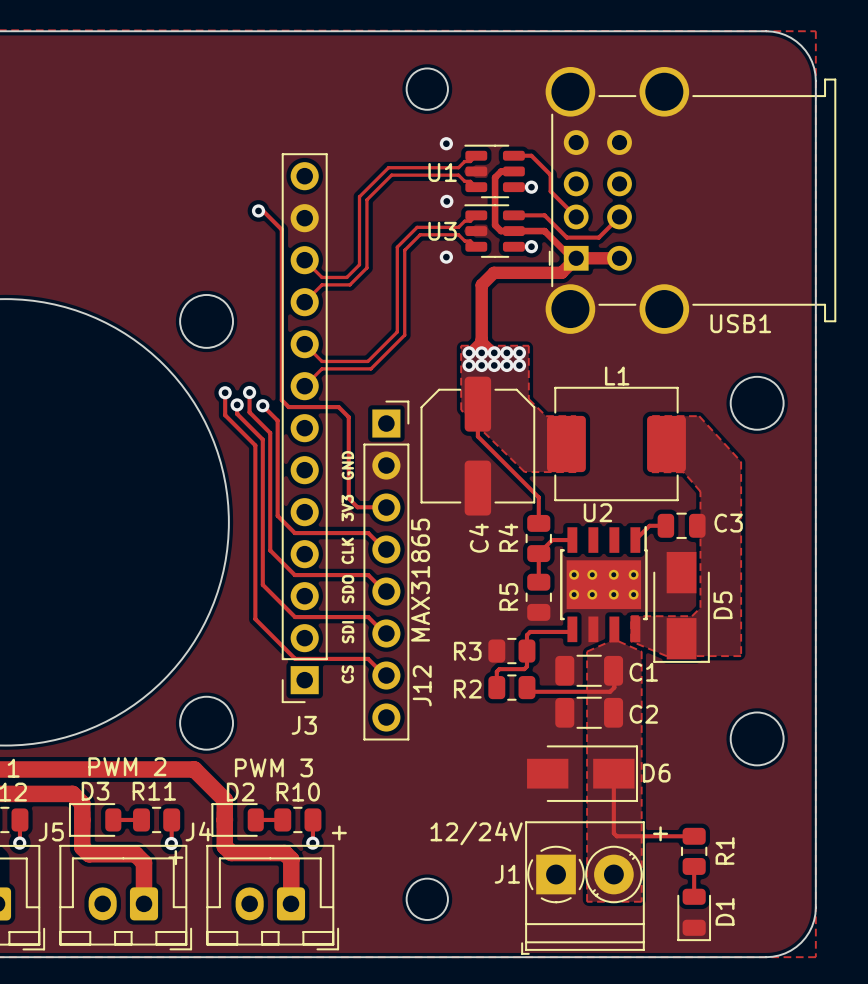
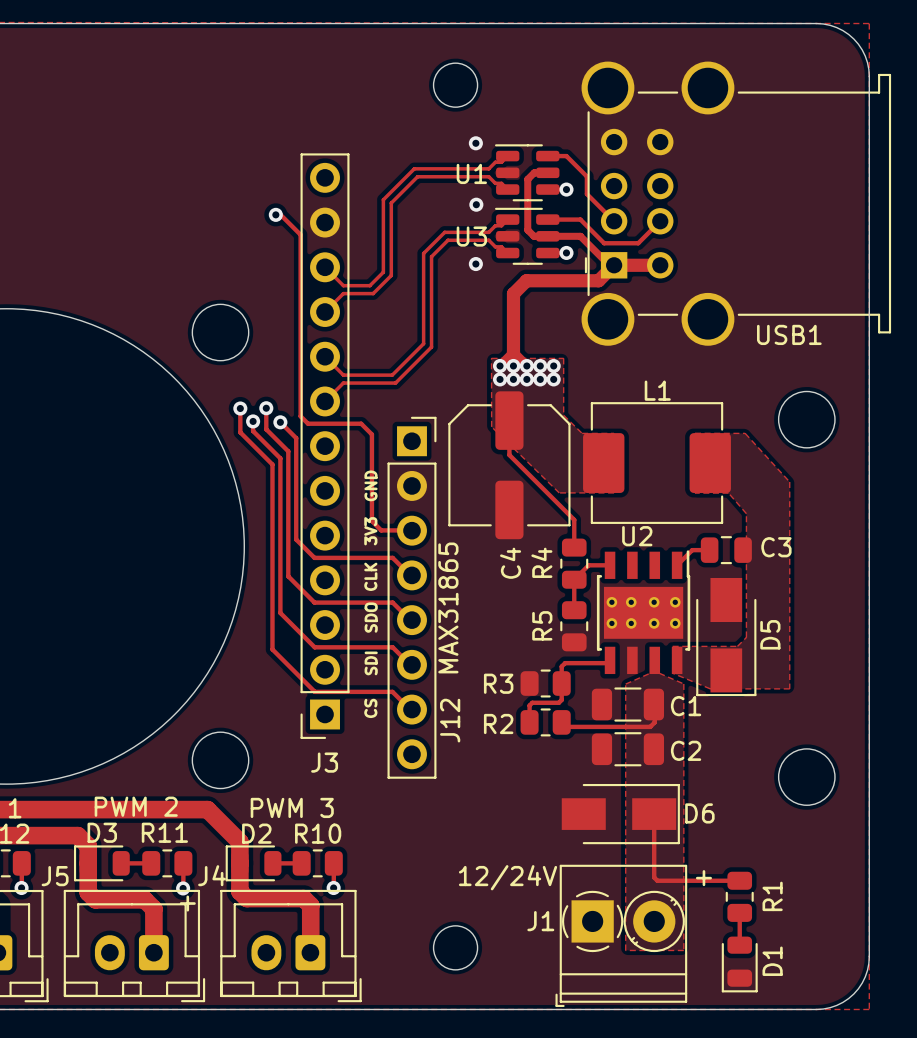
text: + (339, 833) -> none

